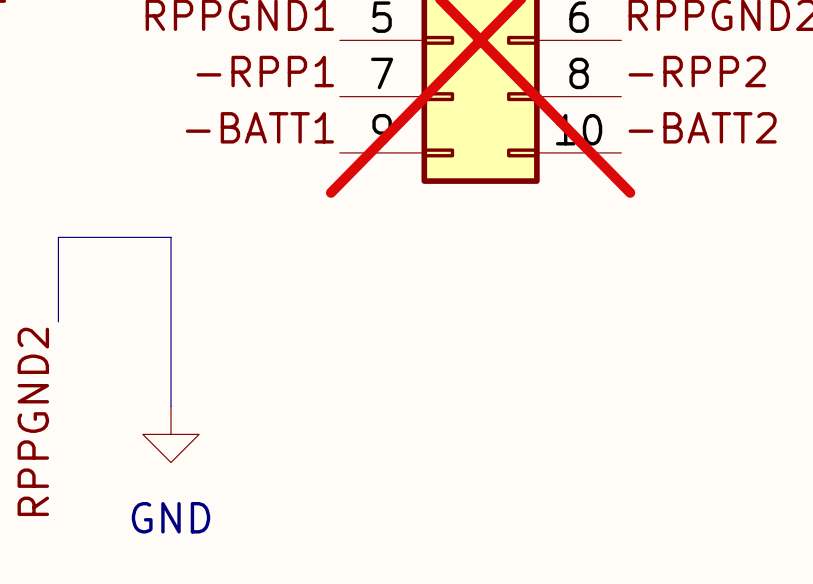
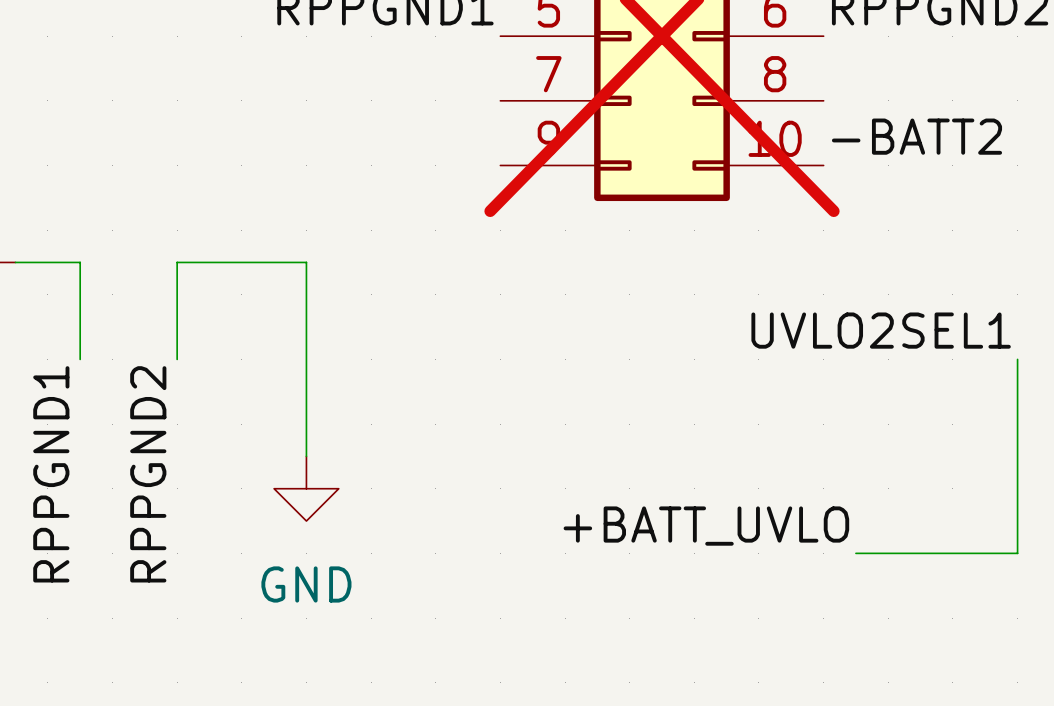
label: -RPP1 (265, 71) -> none
label: -RPP2 (697, 71) -> none
label: -BATT1 (259, 127) -> none
label: none -> UVLO2SEL1 (881, 330)
wire: none -> (1017, 359) (1017, 553) (855, 553)
label: none -> +BATT_UVLO (706, 526)

